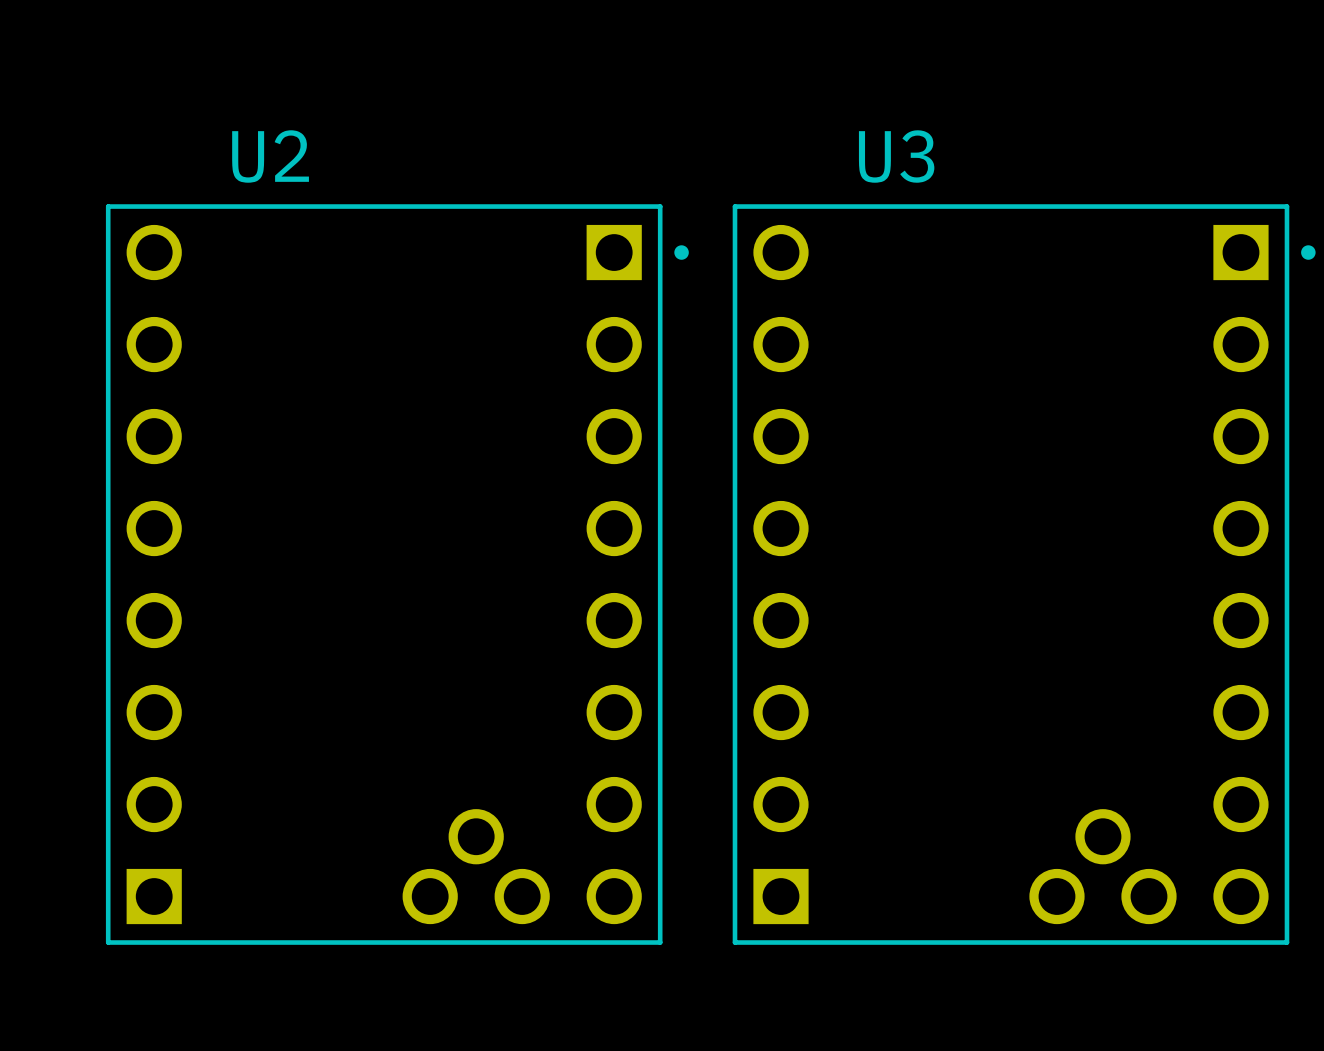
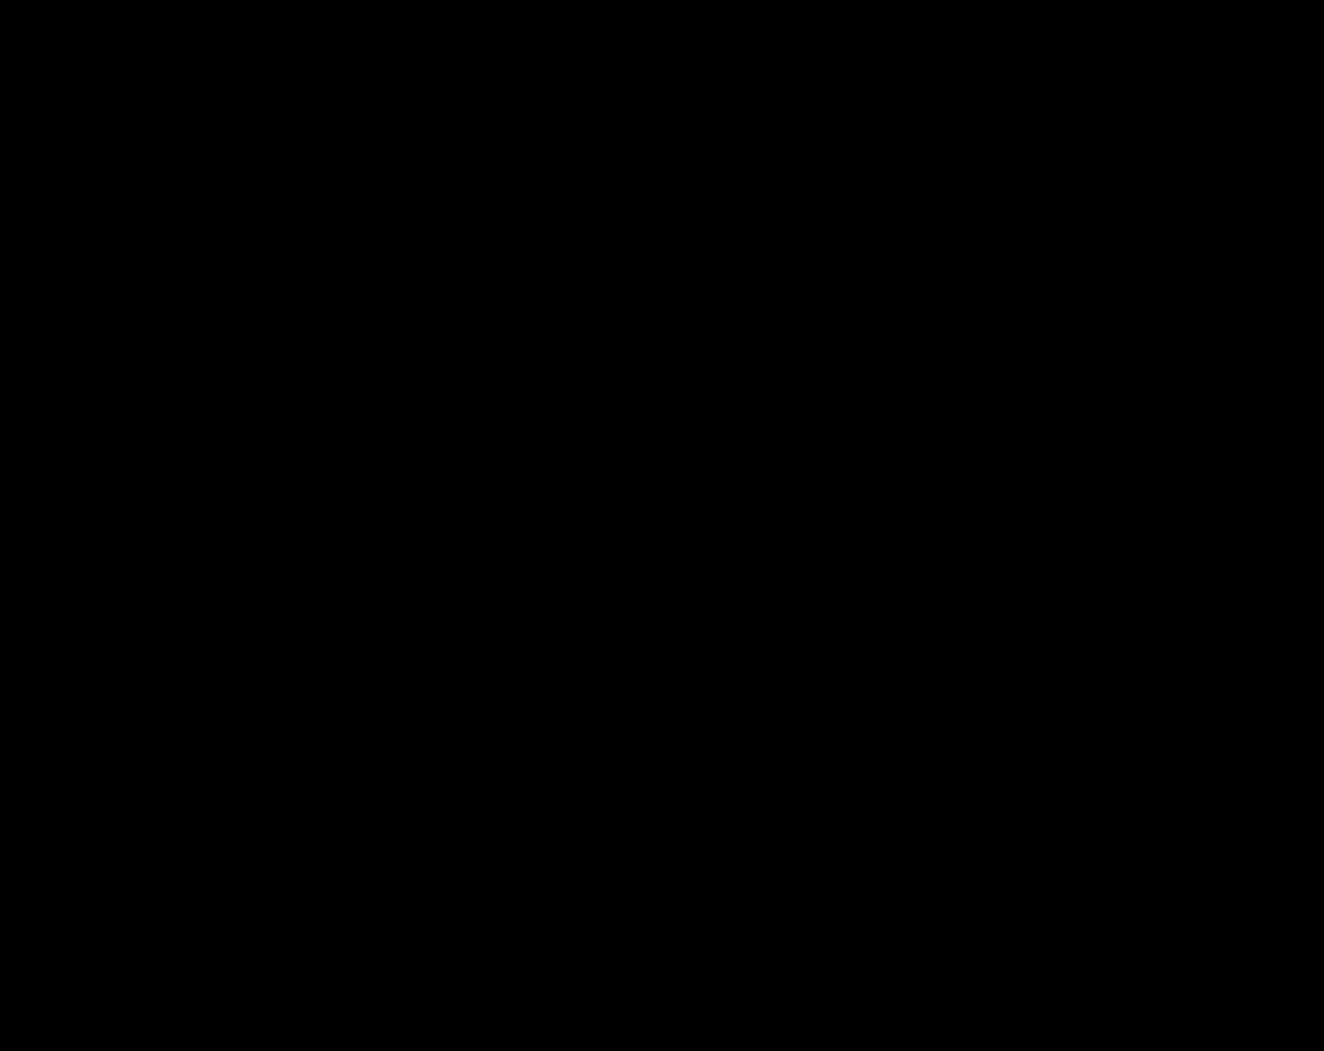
U2: (397, 574) -> none
U3: (1024, 574) -> none

